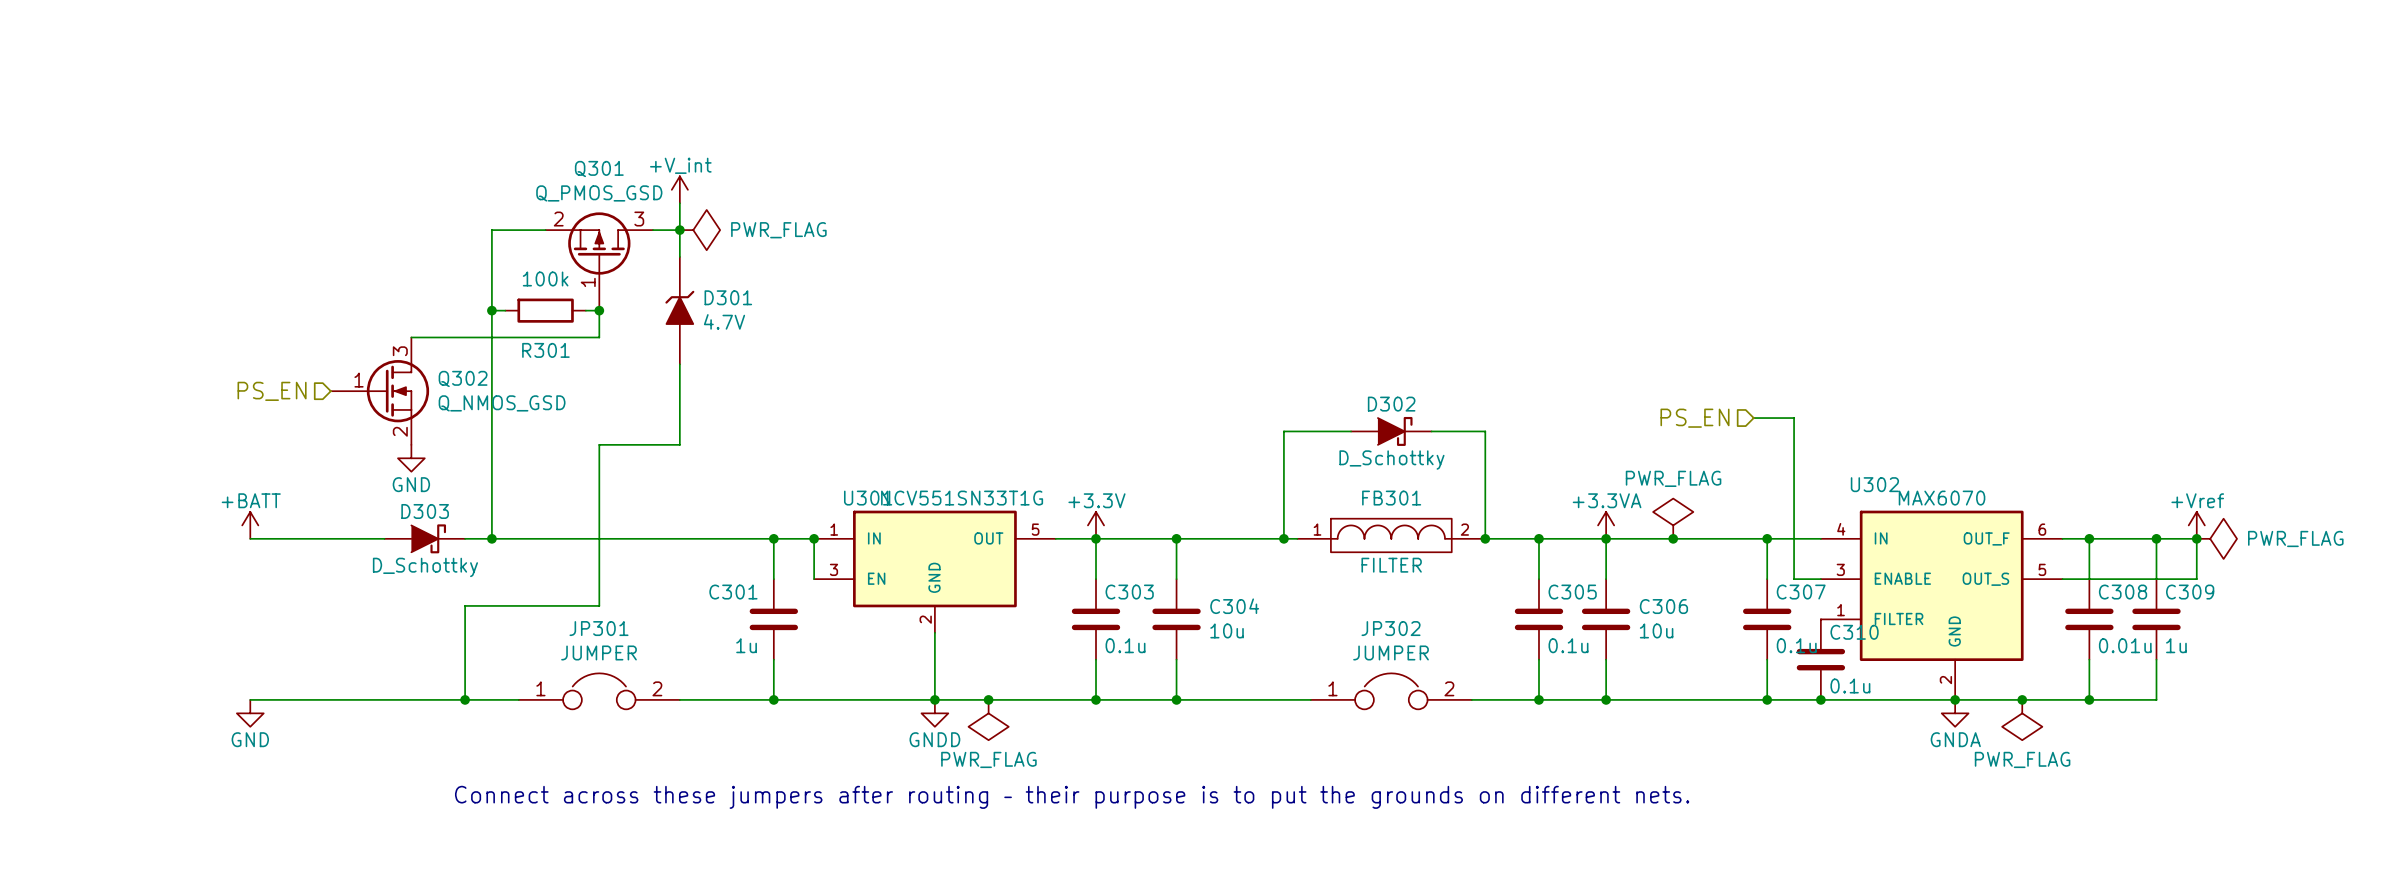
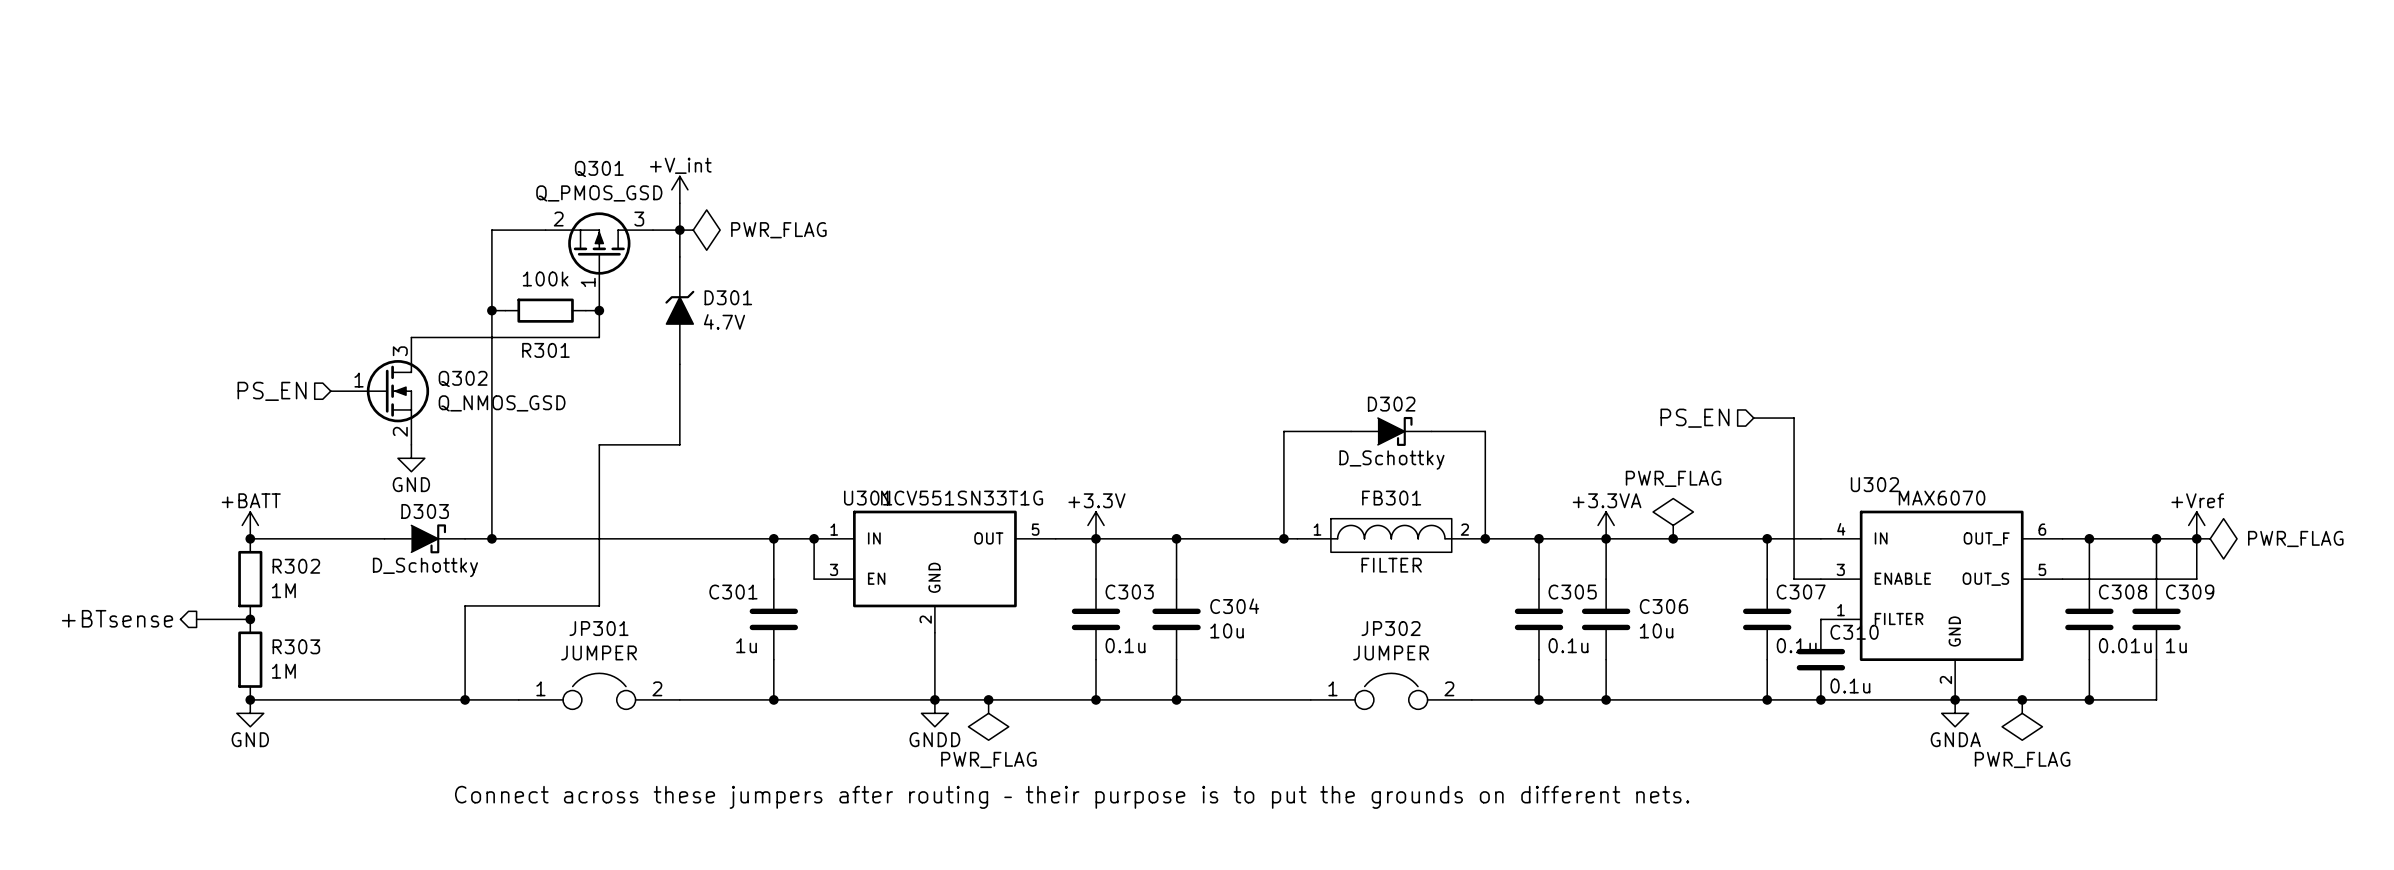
junction: none -> (250, 538)
R302: none -> 1M (250, 579)
hierarchical label: none -> +BTsense (117, 618)
wire: none -> (196, 619) (250, 619)
junction: none -> (250, 619)
R303: none -> 1M (250, 659)
junction: none -> (250, 699)

